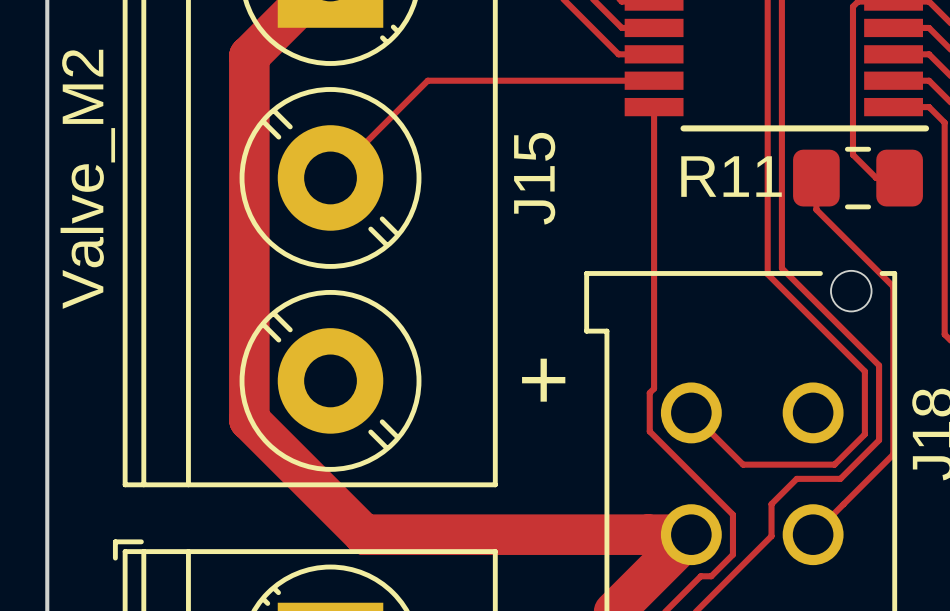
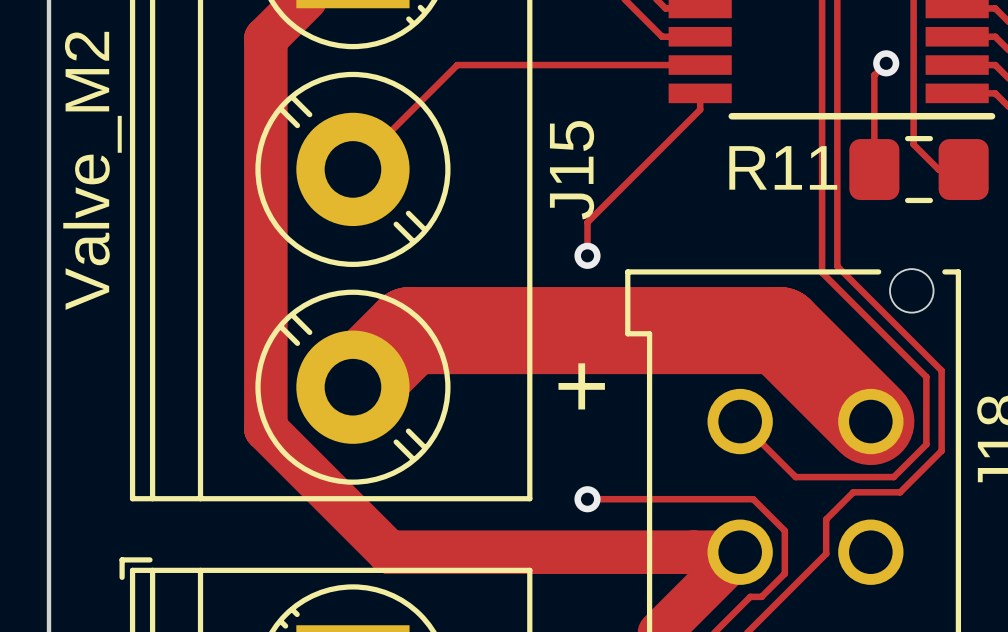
via: none -> (886, 63)
track: (654, 122) (654, 388) (649, 392) (649, 431) (703, 485) -> (700, 109) (587, 222) (587, 255)
track: (816, 178) (816, 209) (893, 286) (893, 454) (813, 534) -> (874, 169) (874, 75) (886, 63)
via: none -> (587, 255)
track: none -> (352, 387) (409, 330) (779, 330) (870, 421)
track: none -> (587, 499) (753, 499)
via: none -> (587, 499)

